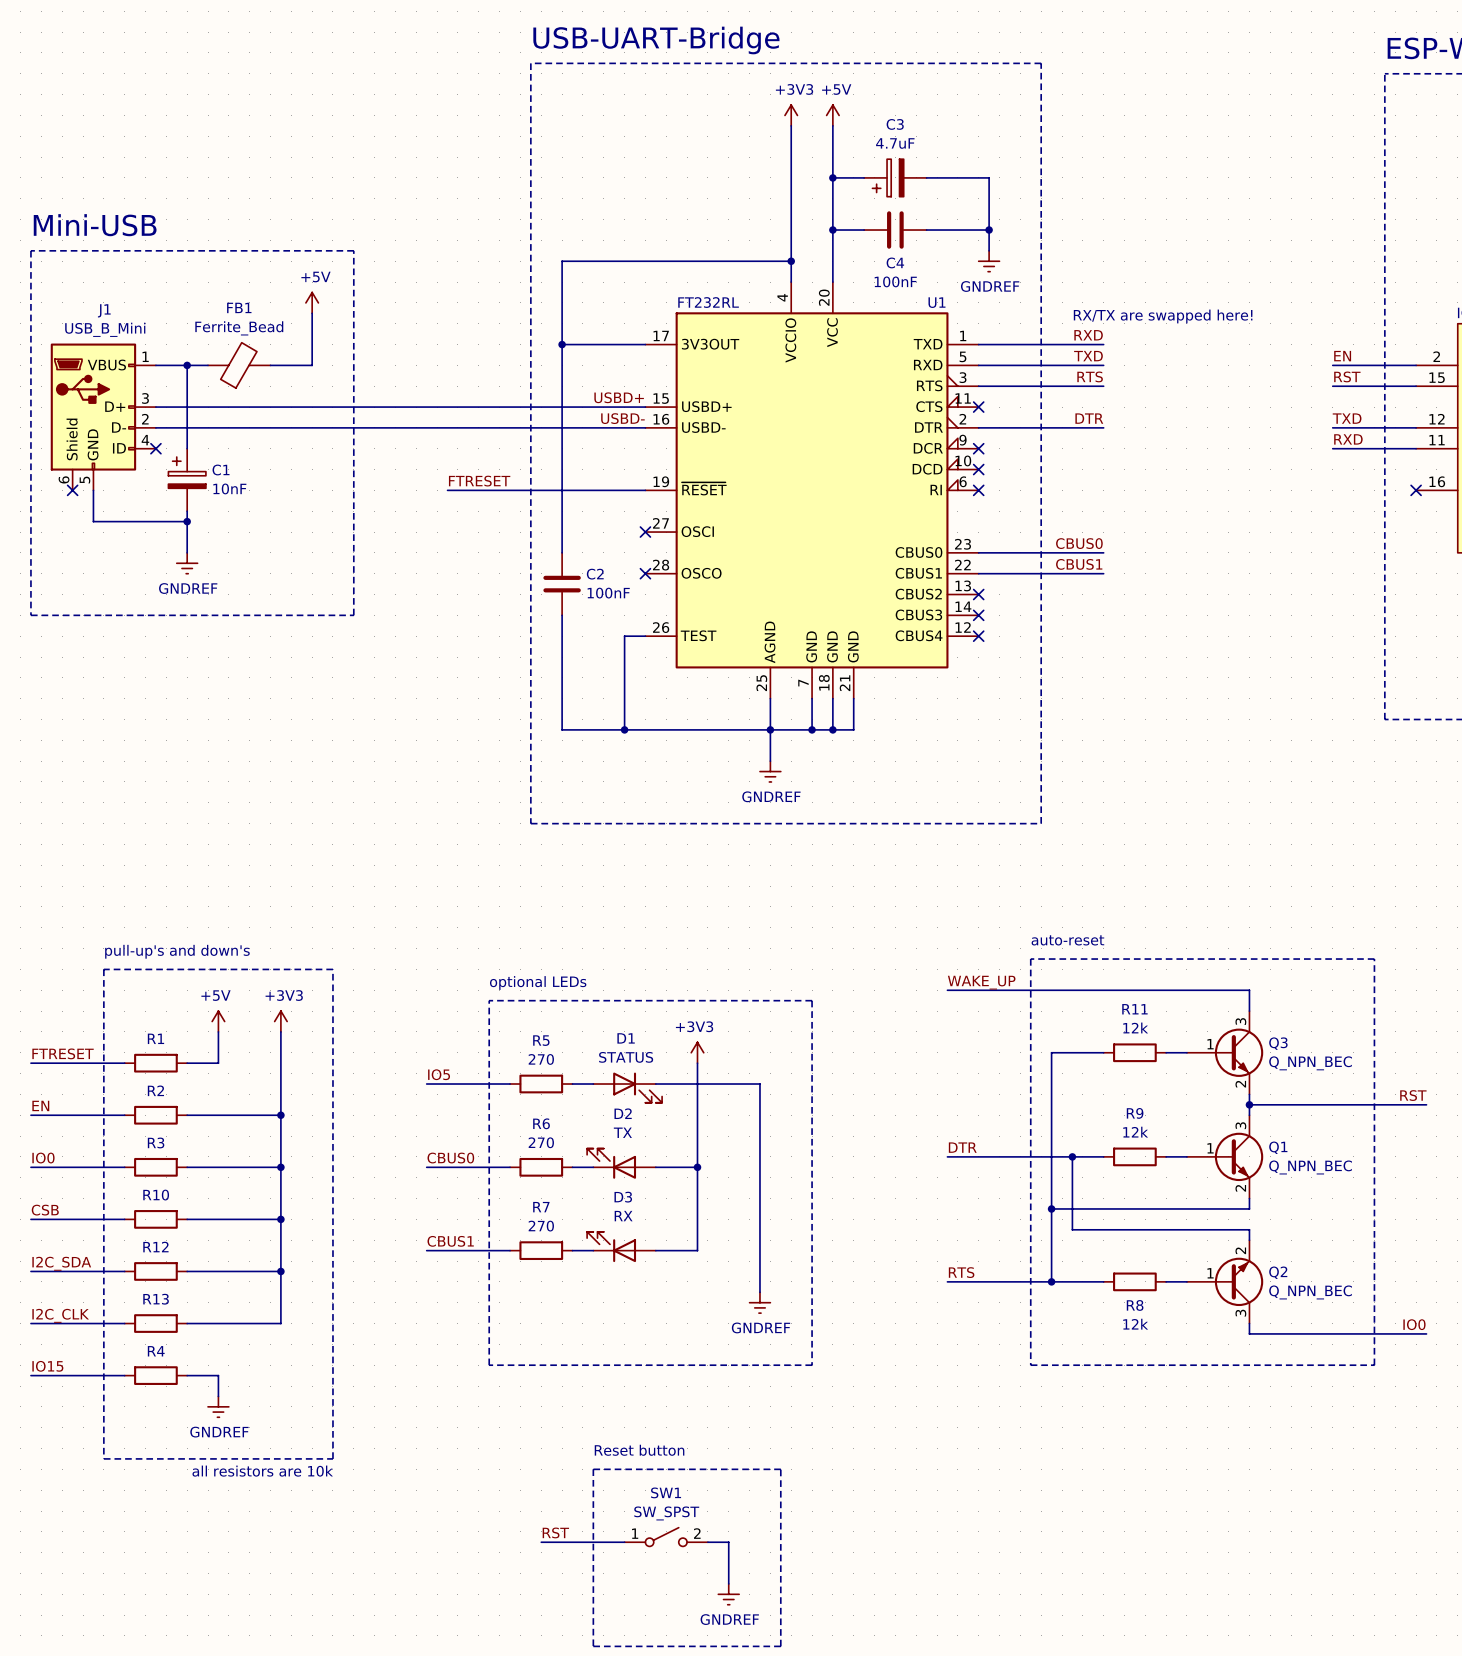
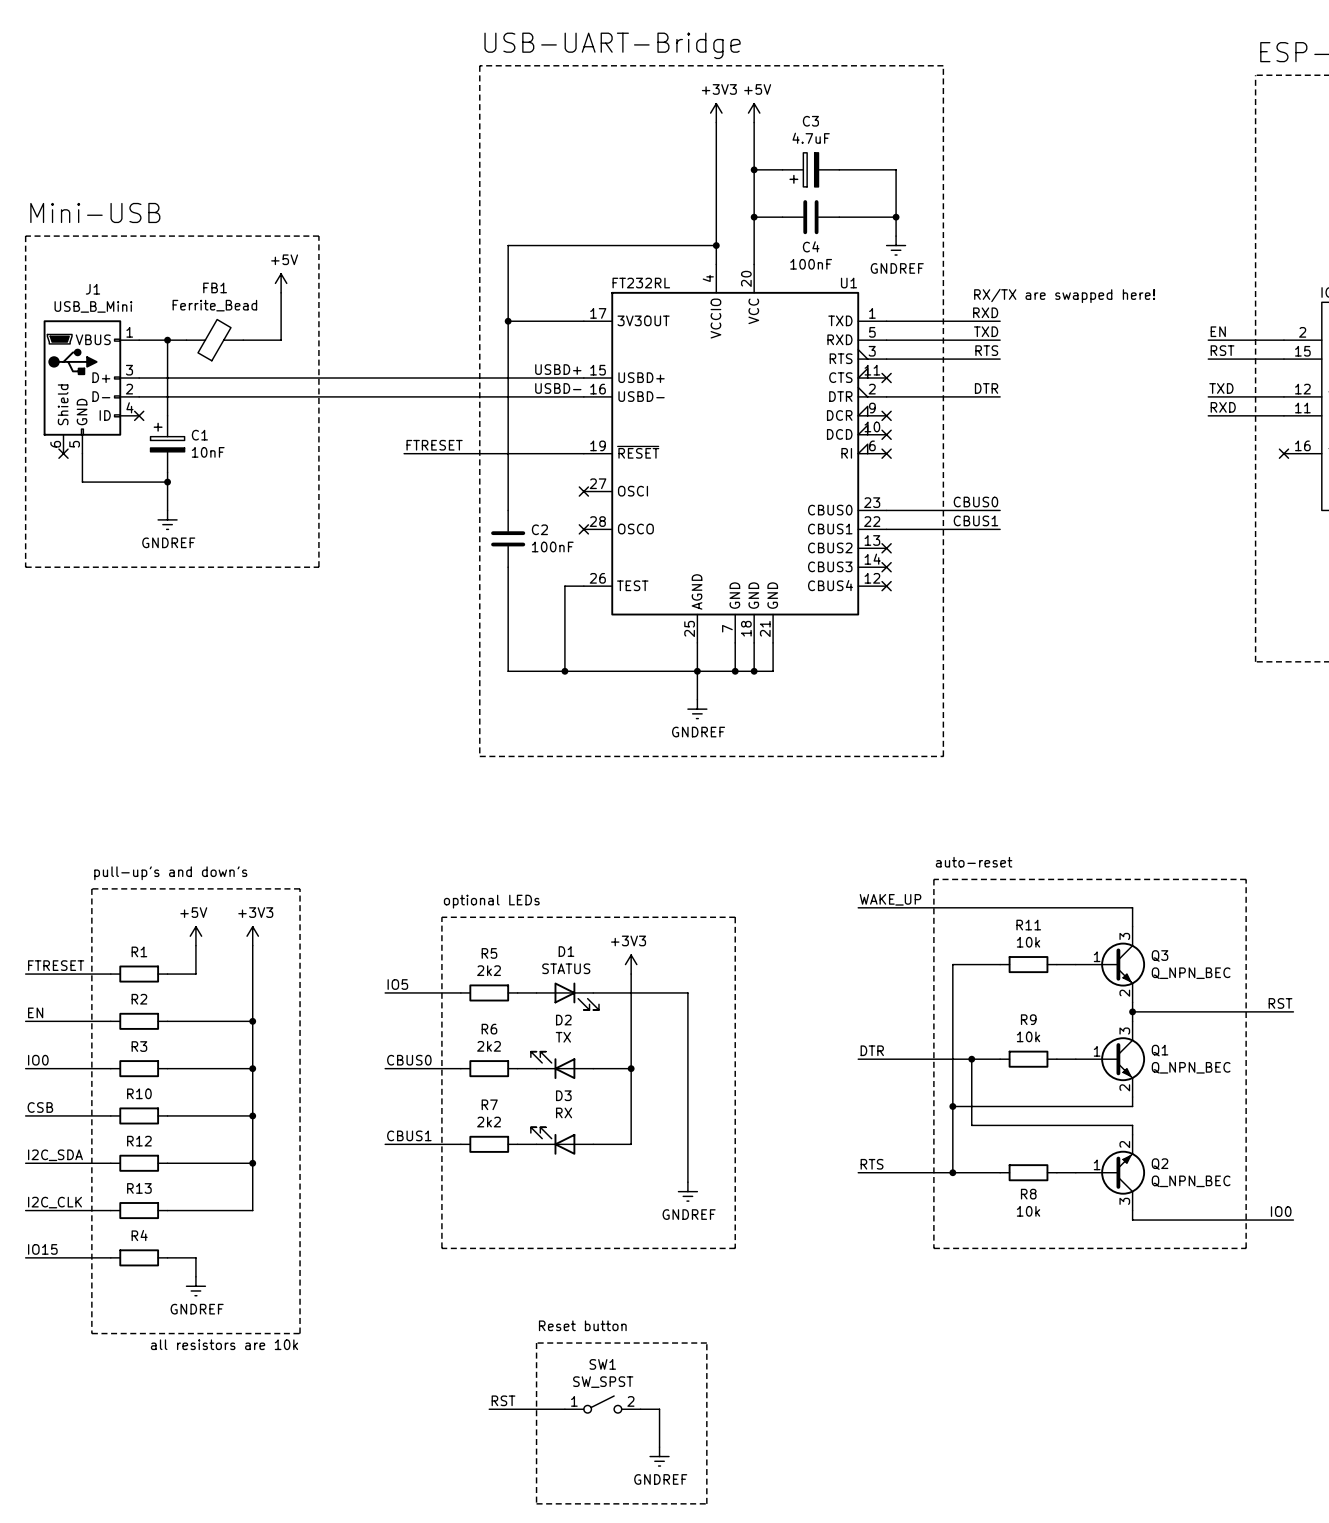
R11 value: 12k (1135, 1027) -> 10k (1028, 942)
R5 value: 270 (541, 1059) -> 2k2 (489, 970)
R9 value: 12k (1135, 1132) -> 10k (1028, 1036)
R6 value: 270 (541, 1142) -> 2k2 (489, 1046)
R7 value: 270 (541, 1226) -> 2k2 (489, 1122)
R8 value: 12k (1135, 1324) -> 10k (1028, 1211)

